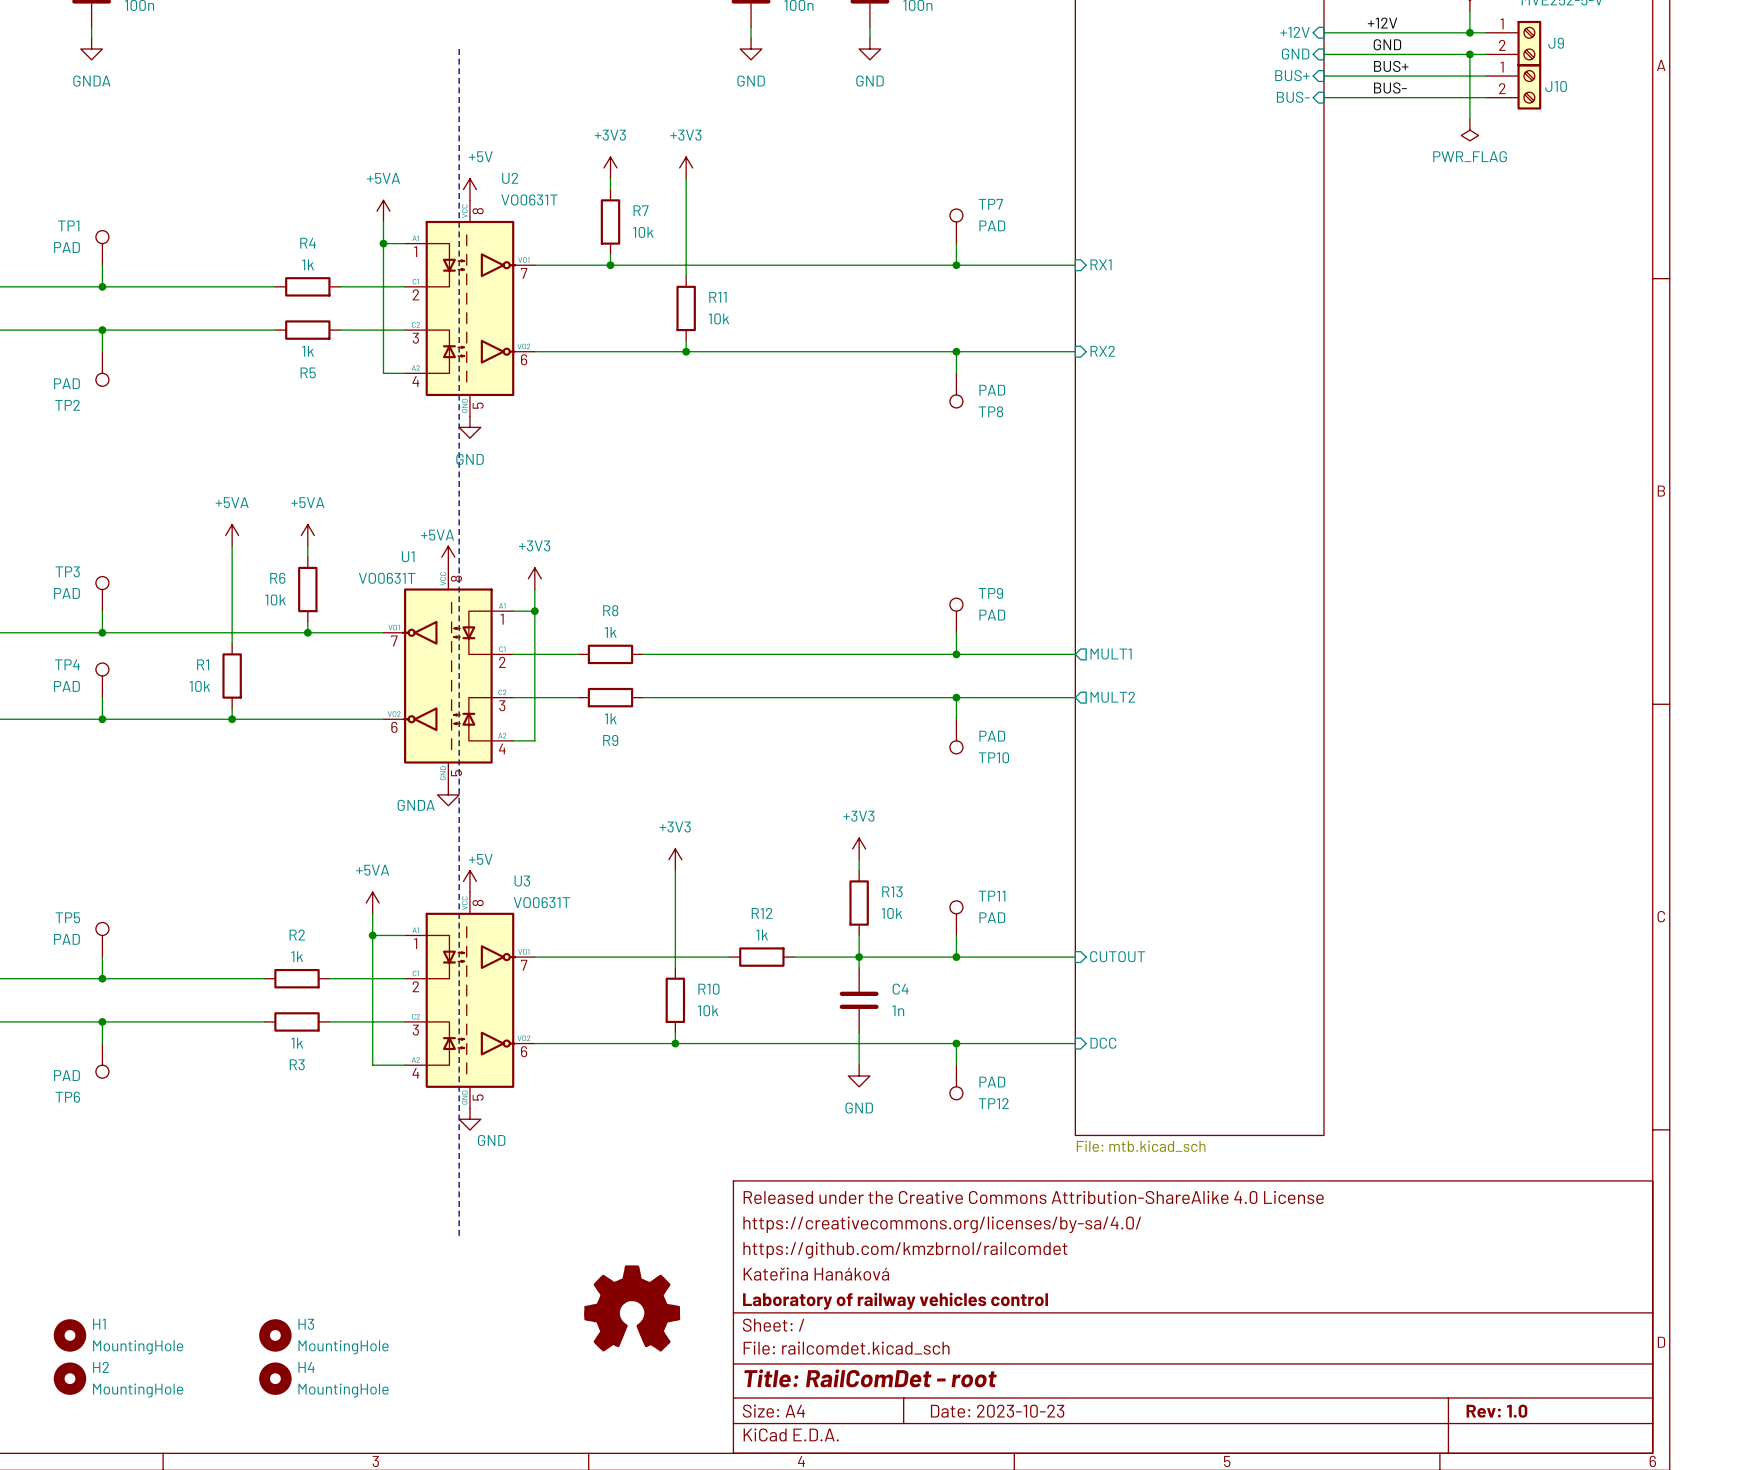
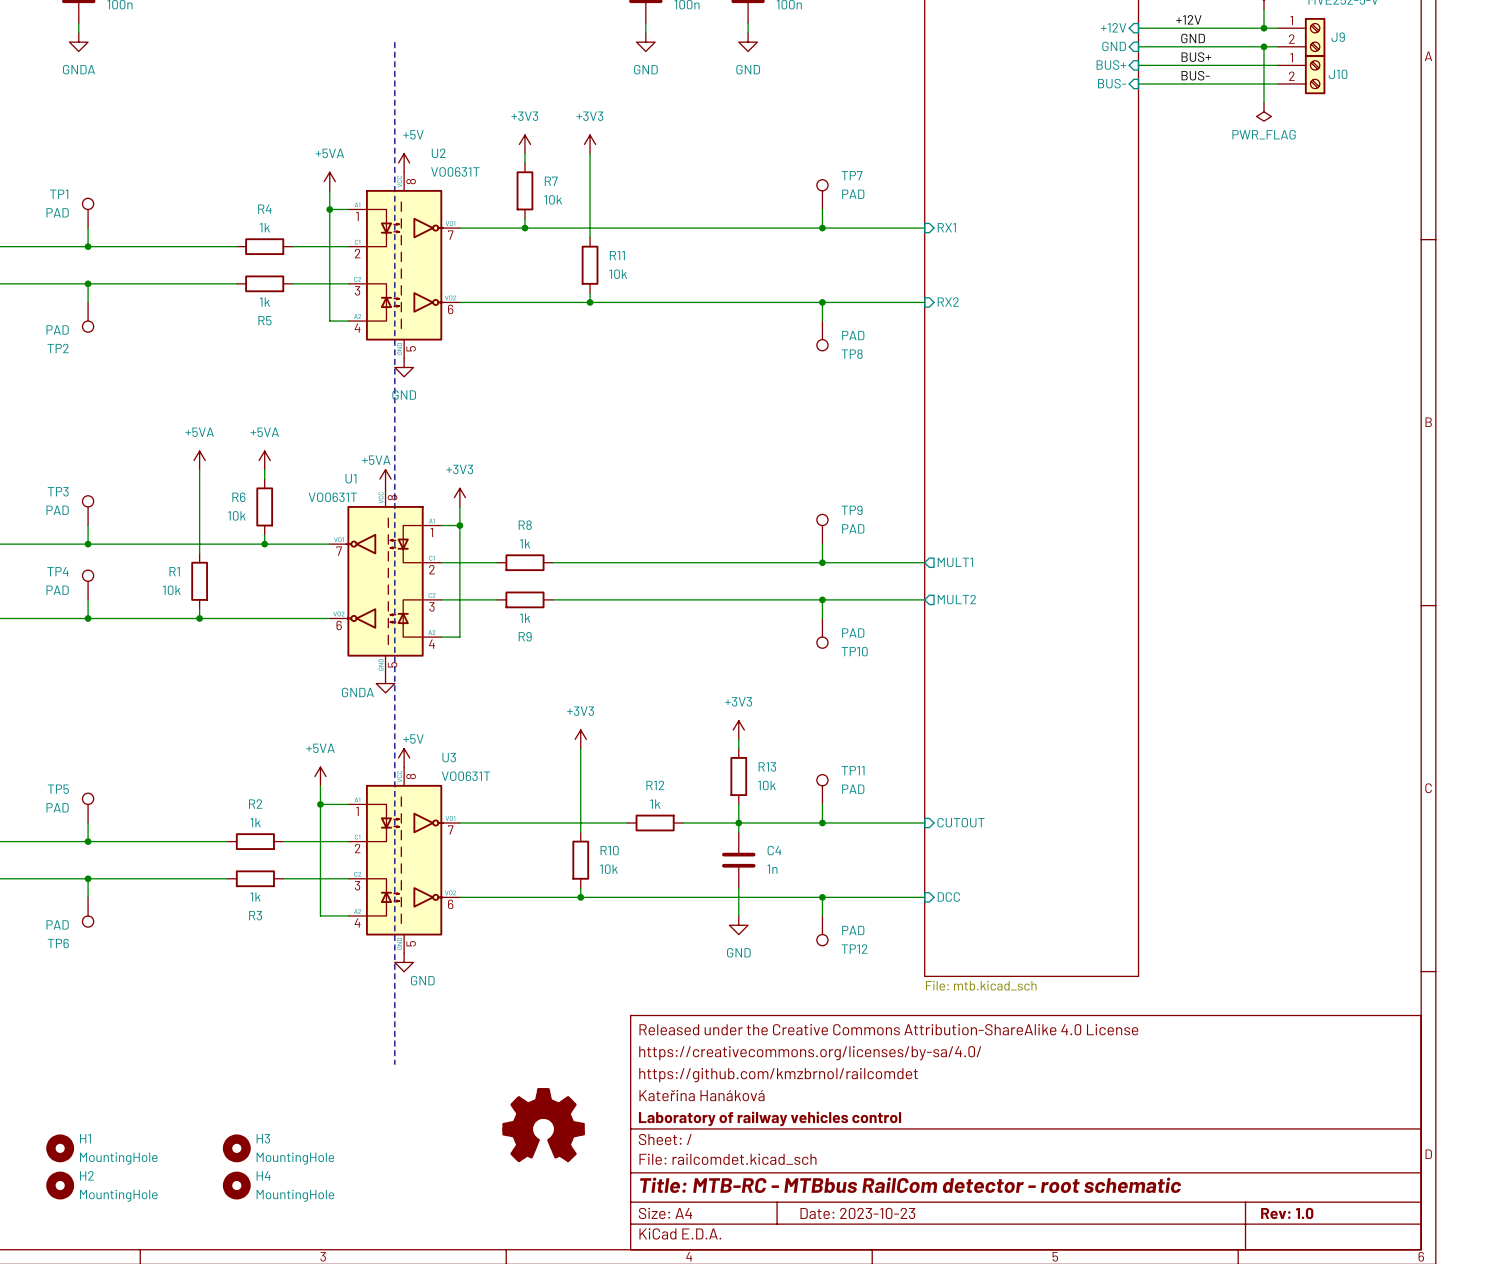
title block: Title: RailComDet - root (870, 1378) -> Title: MTB-RC - MTBbus RailCom detector - root schematic (910, 1185)

